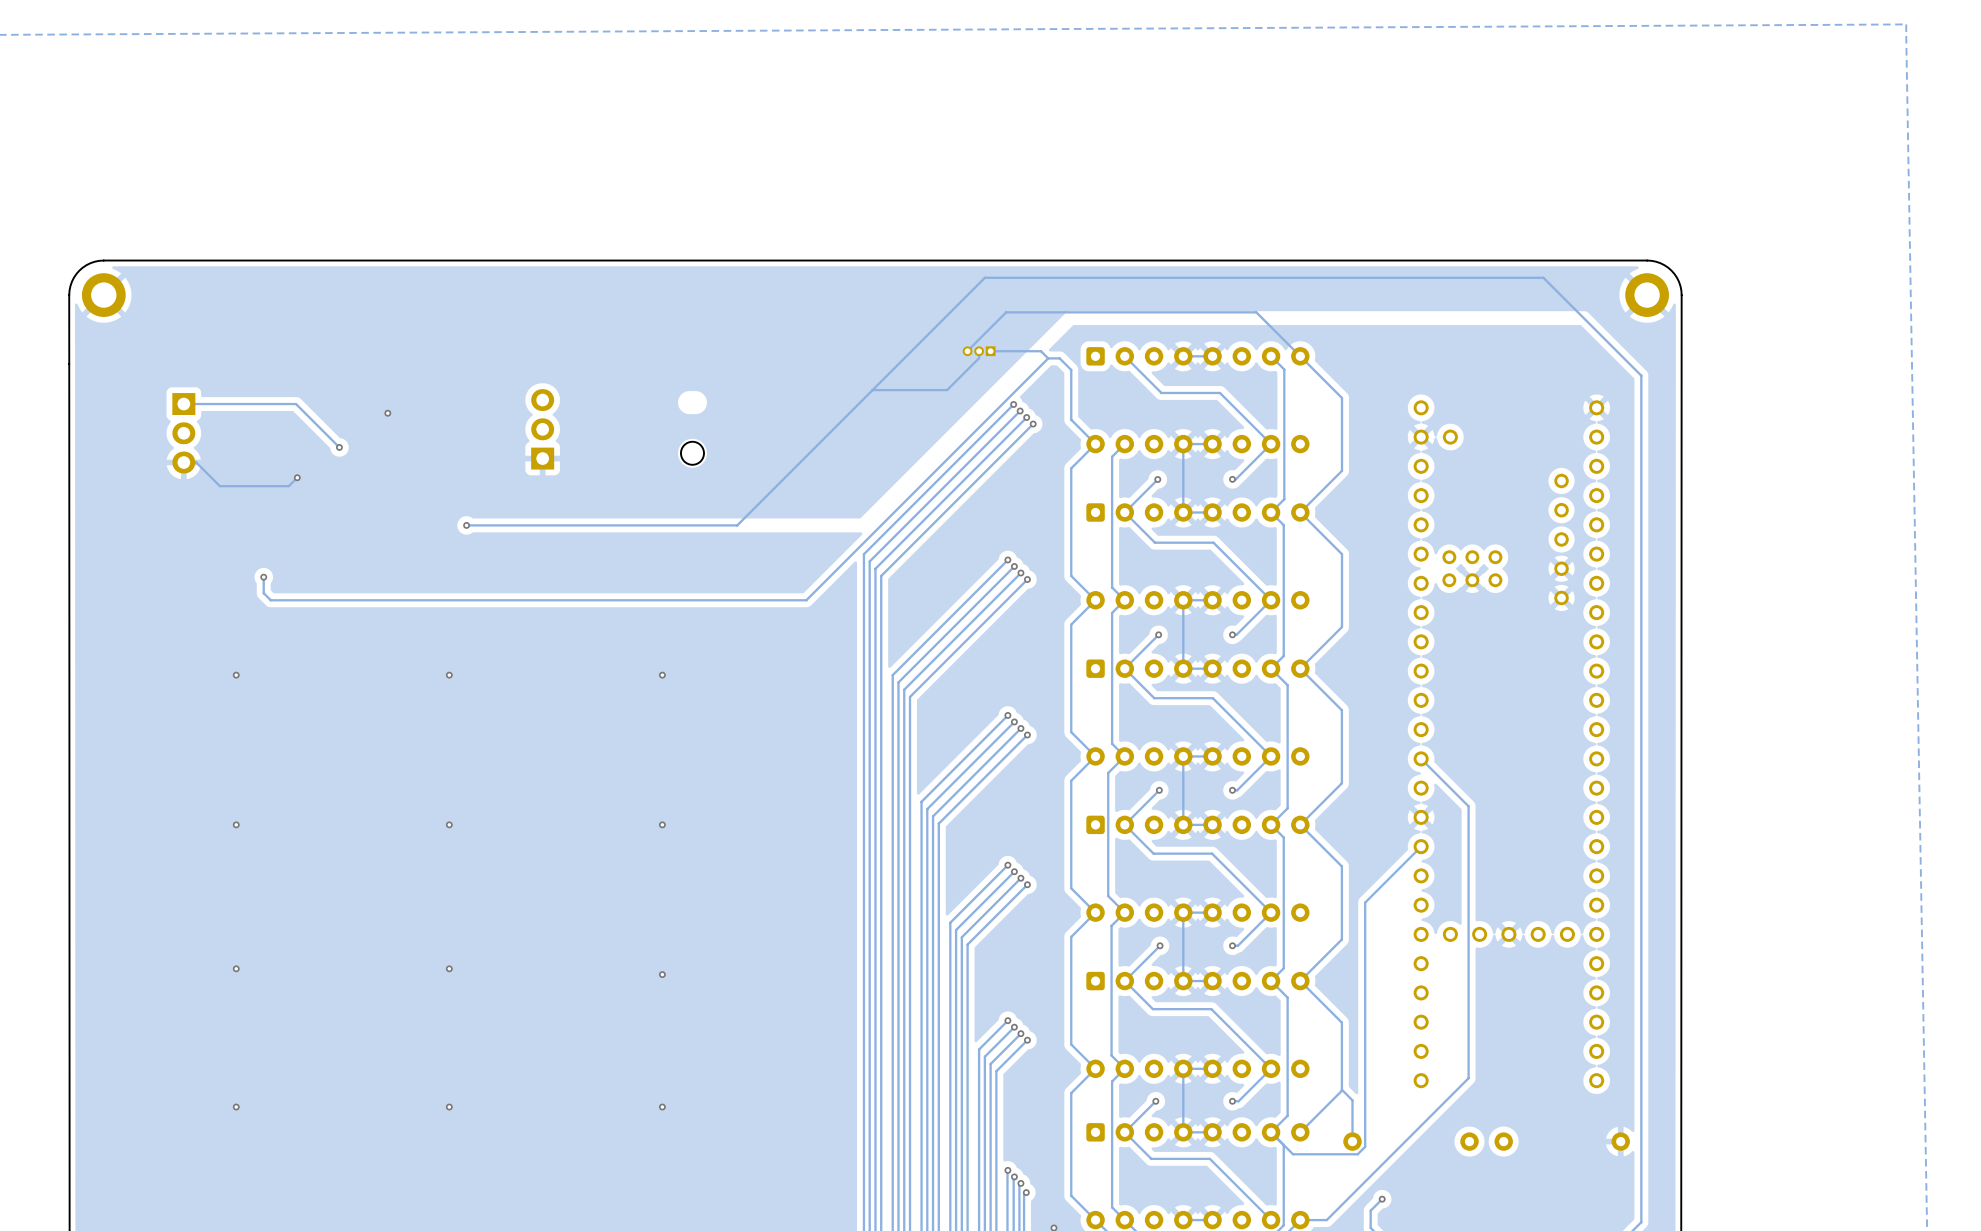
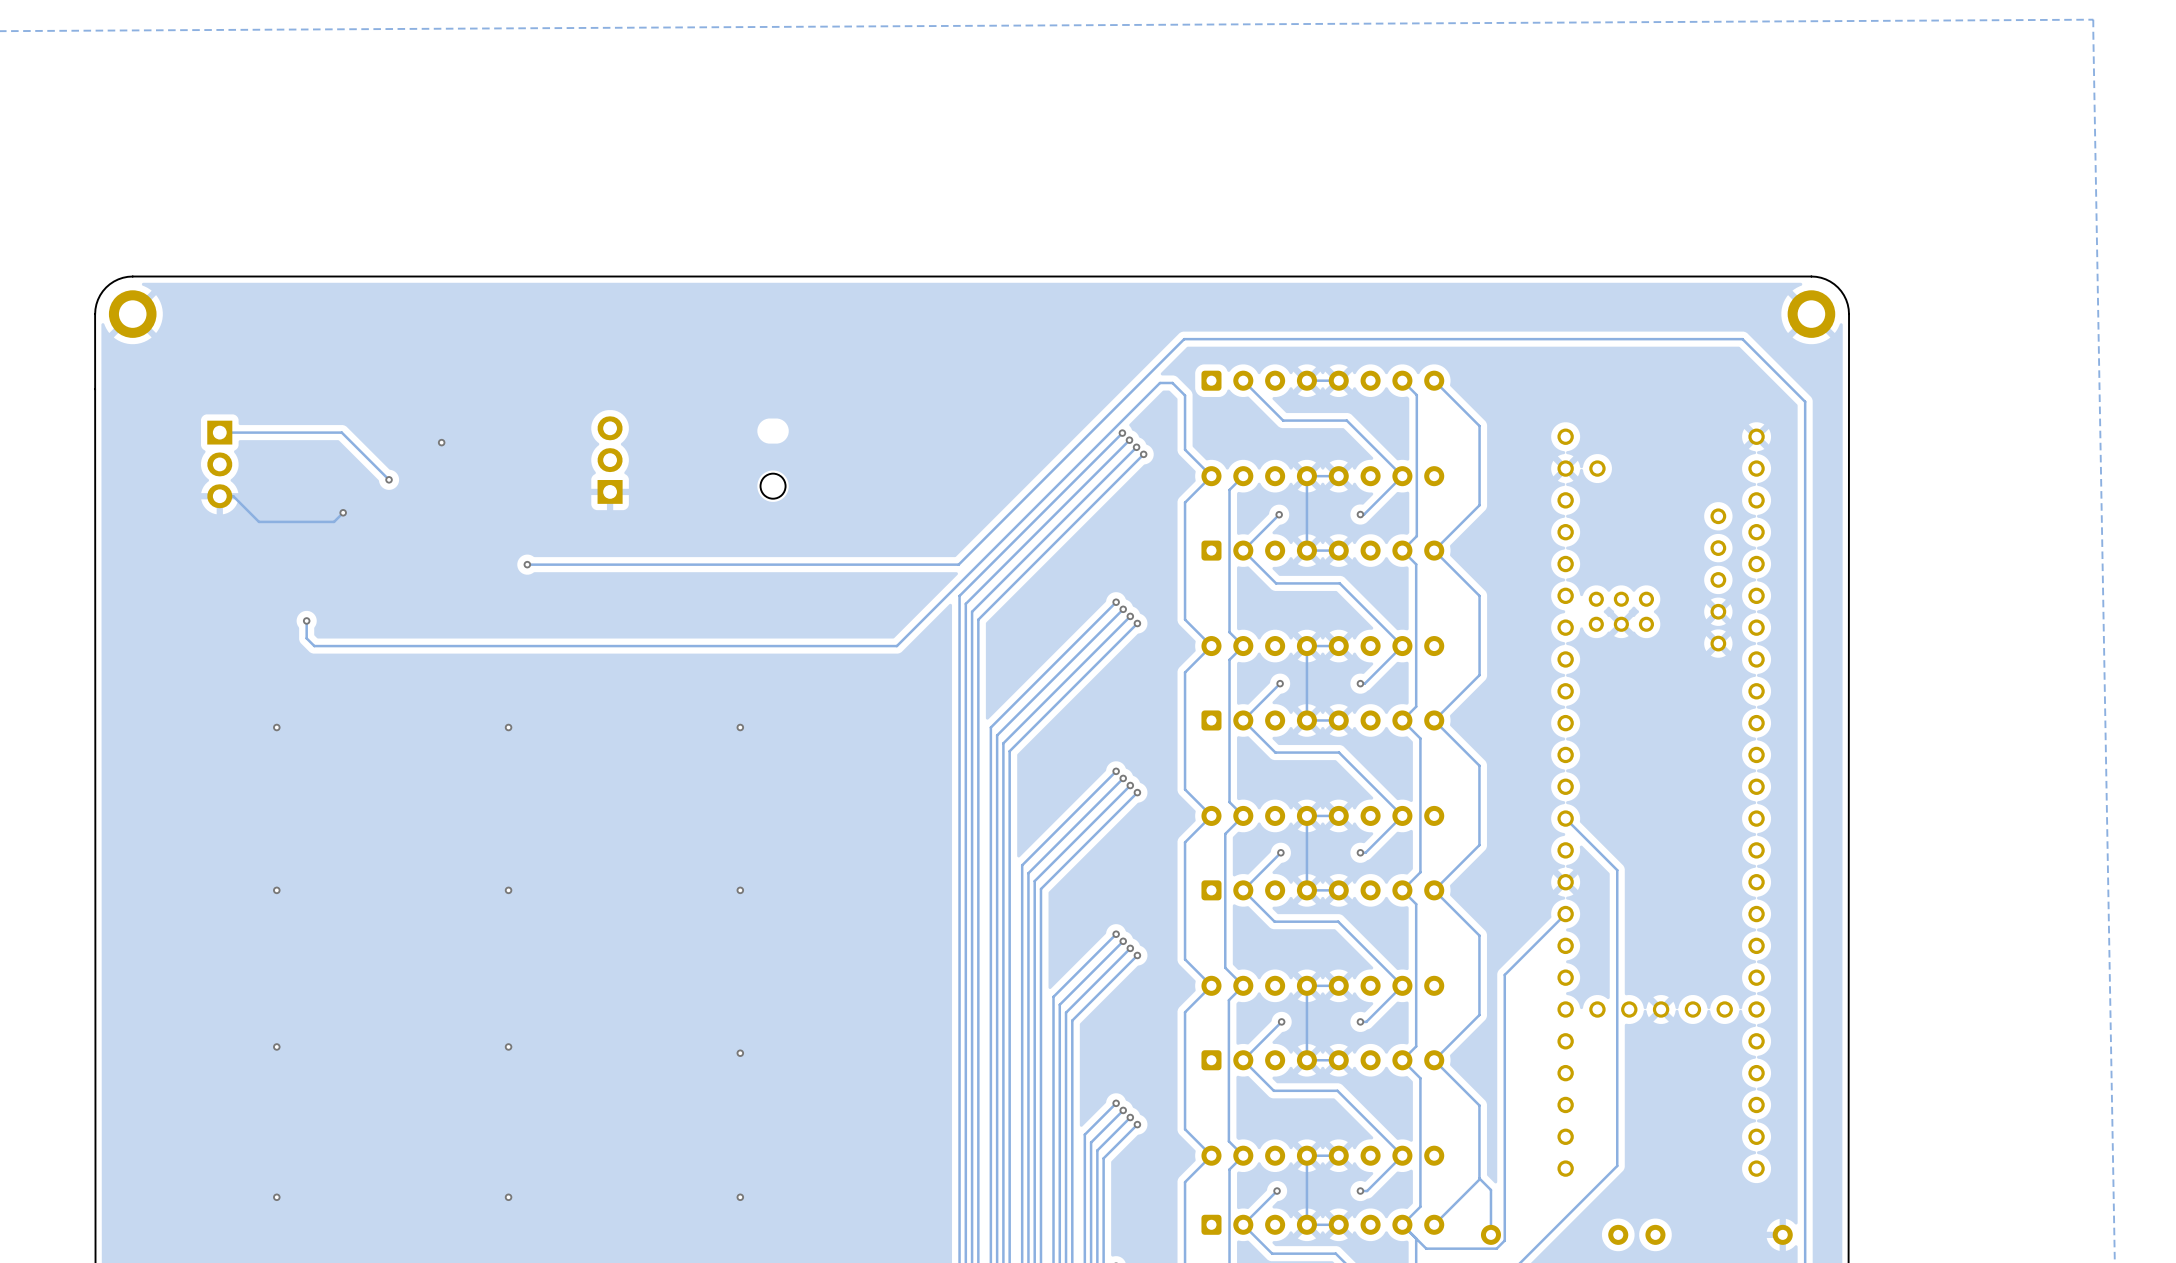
track: (1583, 318) (1543, 277) (984, 277) (737, 525) -> (1742, 339) (1184, 339) (958, 564) (821, 564)
track: (967, 351) (1006, 312) (1256, 312) (1300, 356) -> none
track: (979, 351) (979, 358) (947, 390) (872, 390) -> none
part: (979, 351) -> none
track: (990, 351) (1041, 351) (1048, 358) -> none

